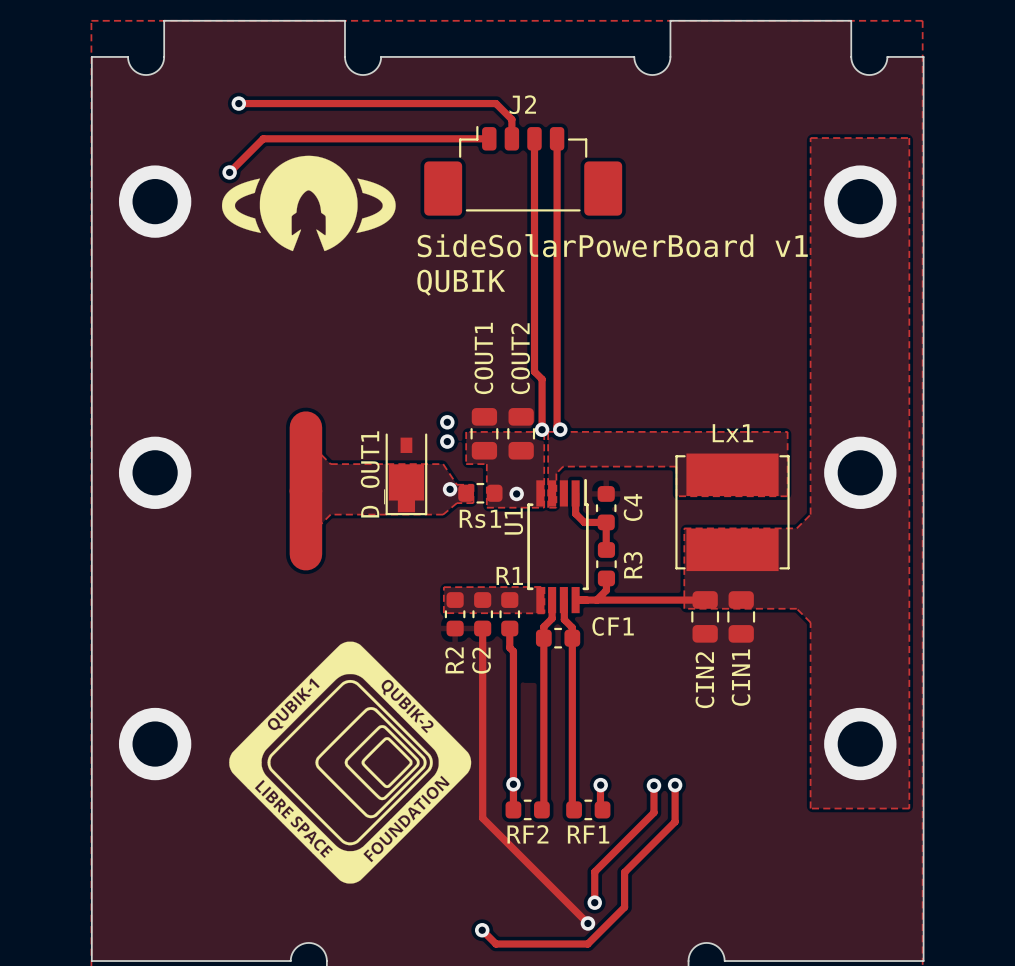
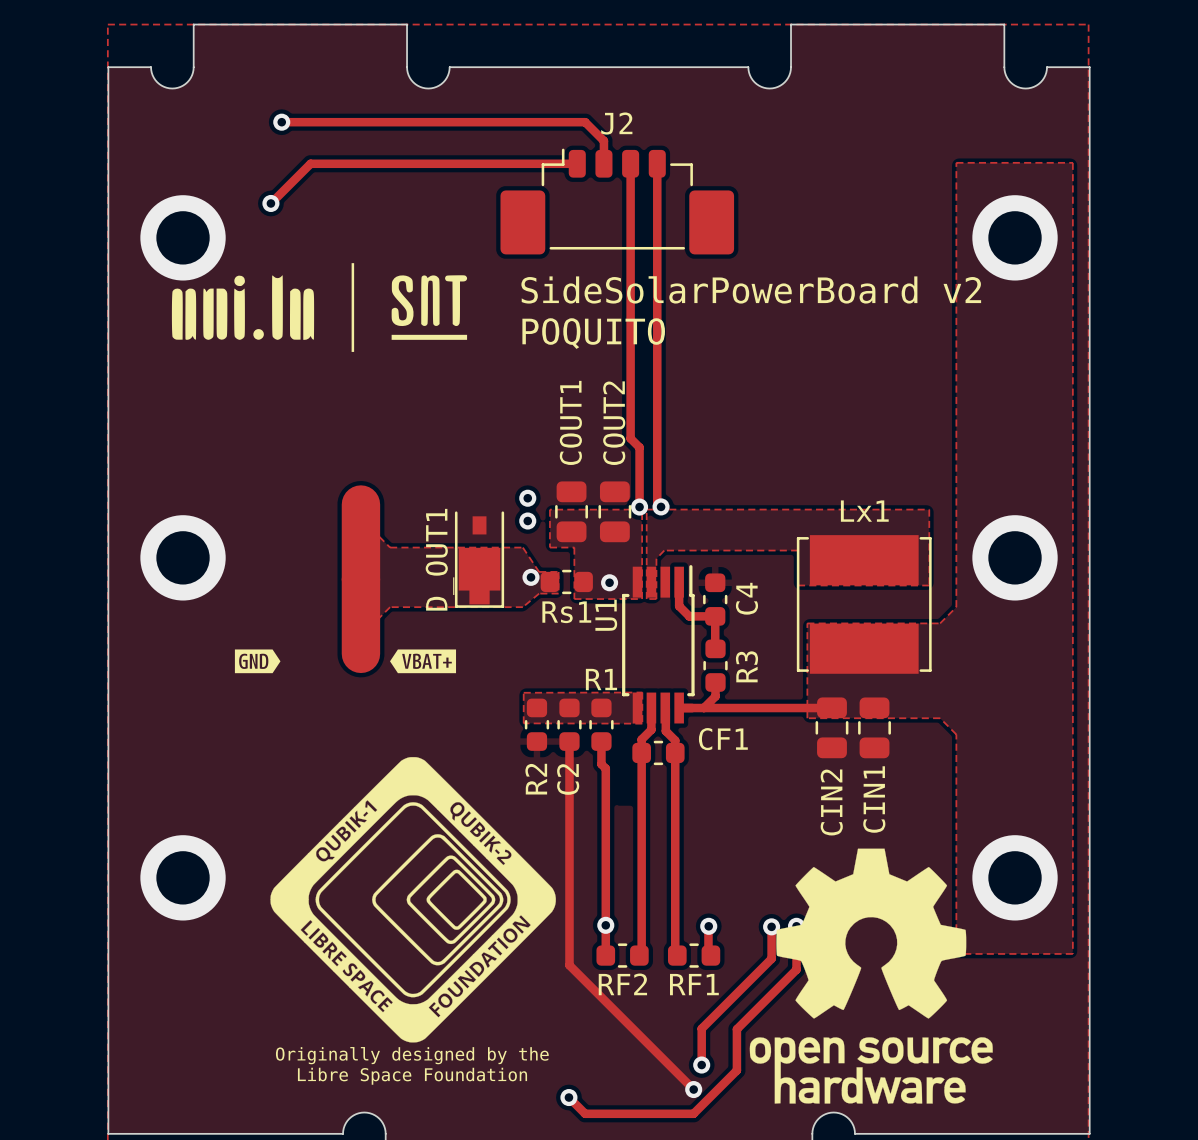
drawing: [221, 155, 396, 252] -> none
drawing: none -> [171, 263, 468, 352]
text: SideSolarPowerBoard v1 (612, 245) -> SideSolarPowerBoard v2 (751, 289)
text: QUBIK (461, 282) -> none
text: none -> POQUITO (593, 333)
drawing: none -> [234, 649, 281, 674]
drawing: none -> [390, 649, 457, 674]
drawing: none -> [749, 848, 993, 1104]
text: none -> Originally designed by the (412, 1055)
text: none -> Libre Space Foundation (412, 1076)

